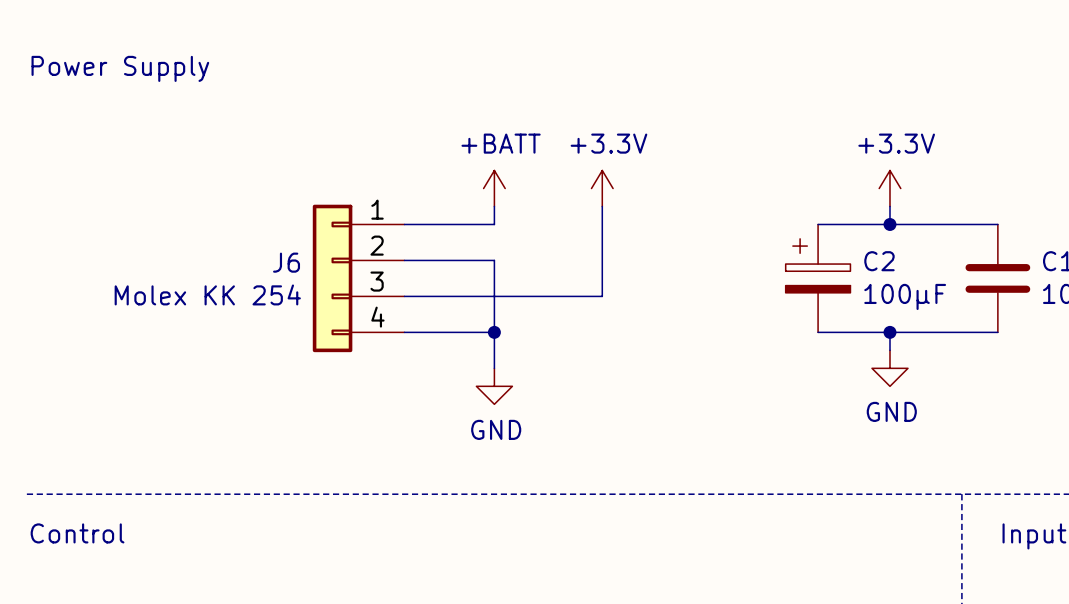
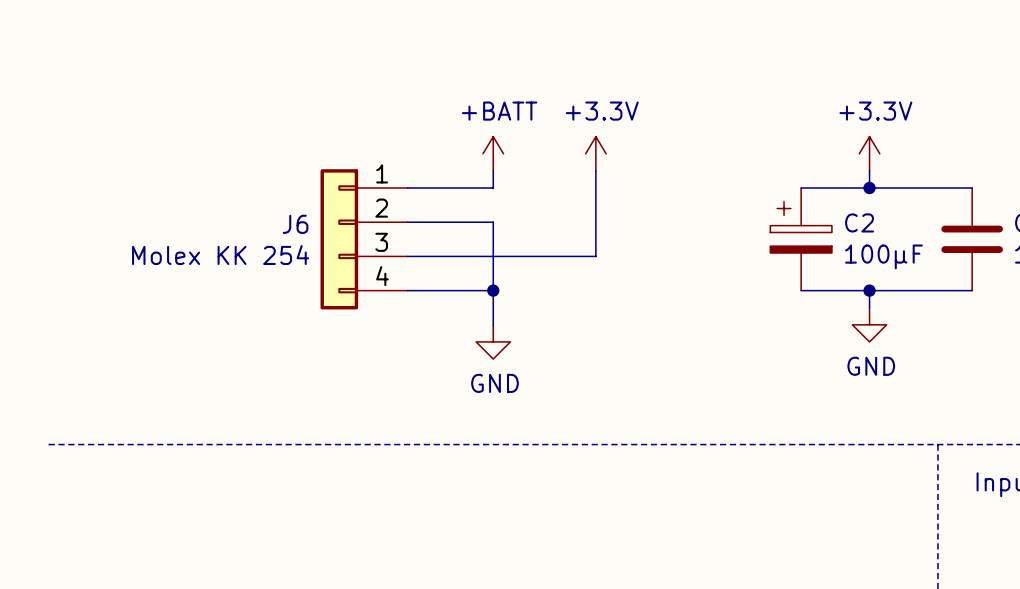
text: Power Supply (120, 68) -> none
text: Control (77, 533) -> none

